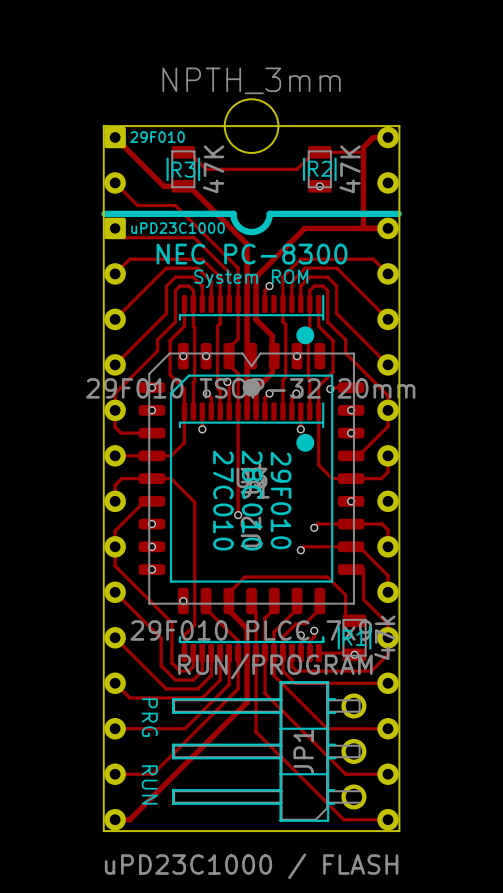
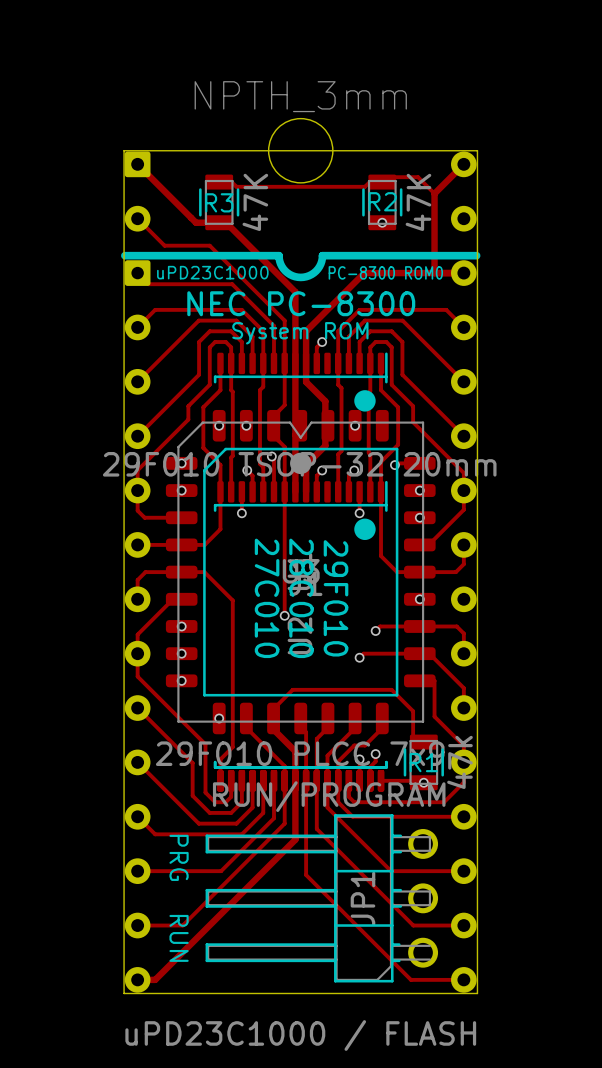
text: 29F010 (157, 137) -> none
track: (388, 137) (373, 137) (363, 147) -> (463, 164) (434, 193) (418, 177) (374, 177) (364, 186) (236, 186) (226, 177) (220, 177)
track: (363, 147) (362, 152) (314, 152) (297, 169) (206, 169) (189, 152) (183, 152) -> none
track: (363, 147) (363, 162) -> none
text: none -> PC-8300 ROM0 (385, 272)

